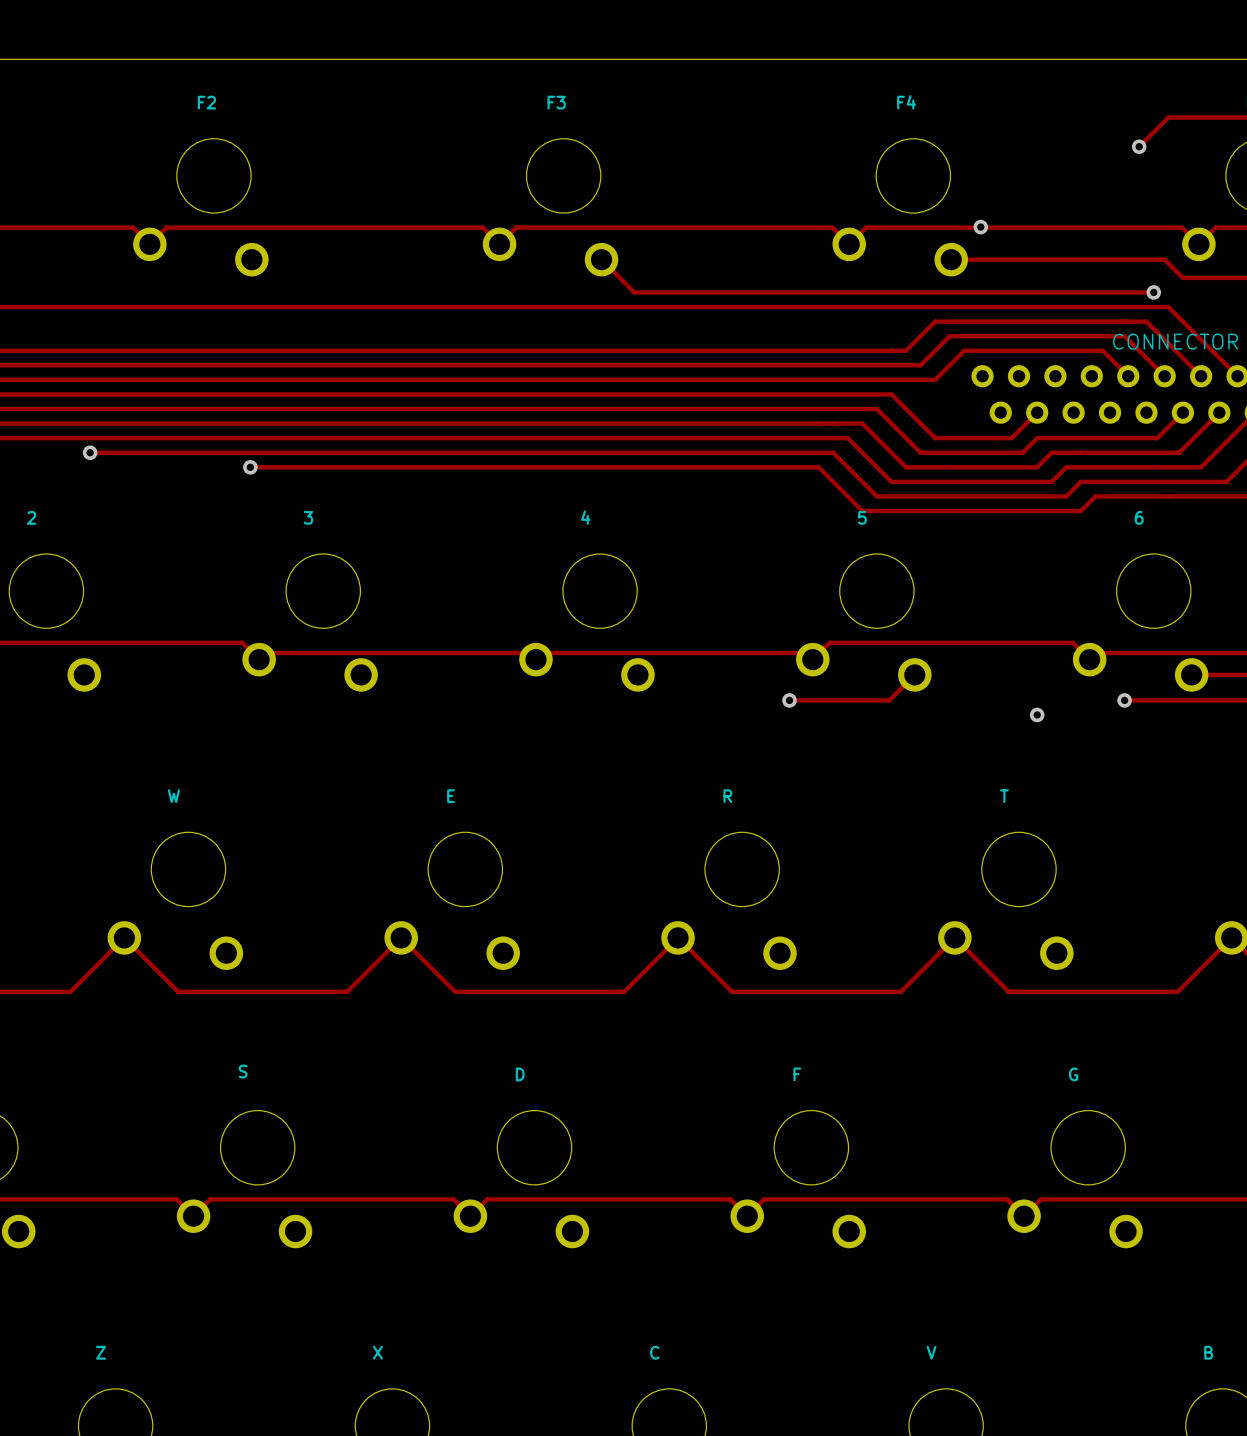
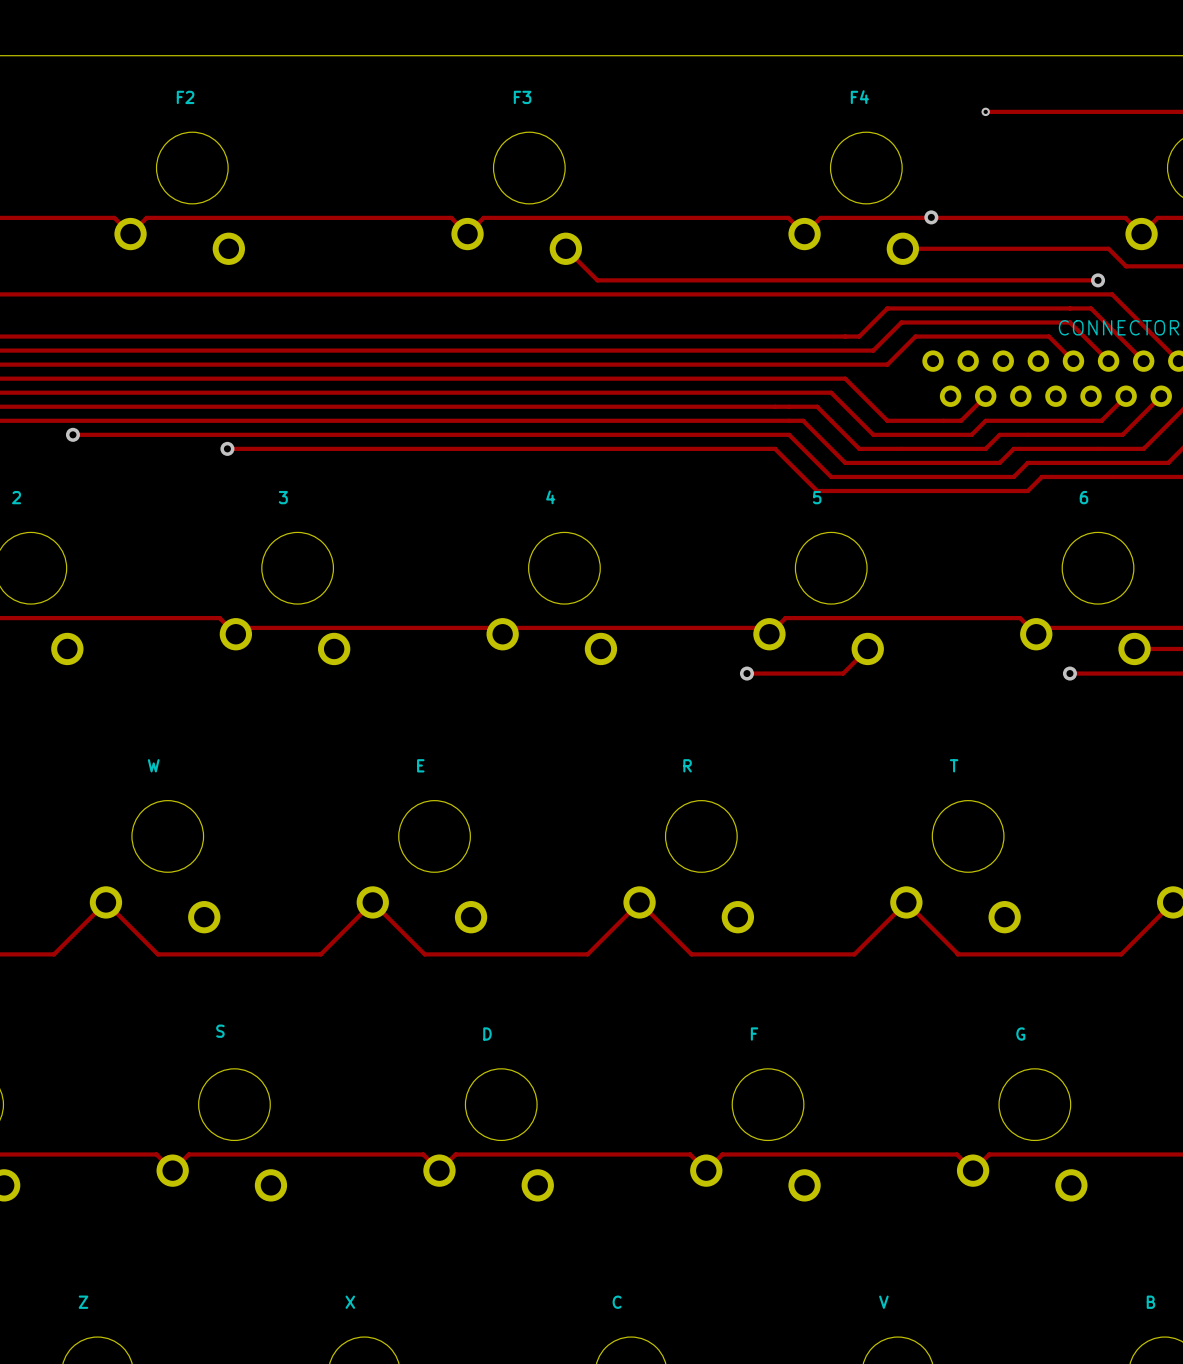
via: none -> (985, 111)
track: (1168, 117) (1139, 146) -> (1112, 111) (985, 111)
via: (1139, 146) -> none
via: (1037, 714) -> none

